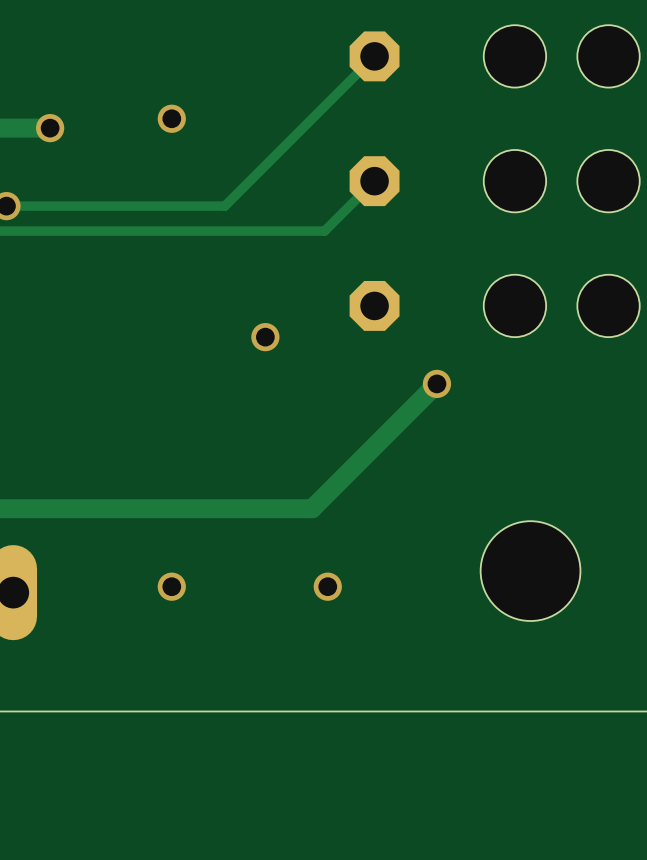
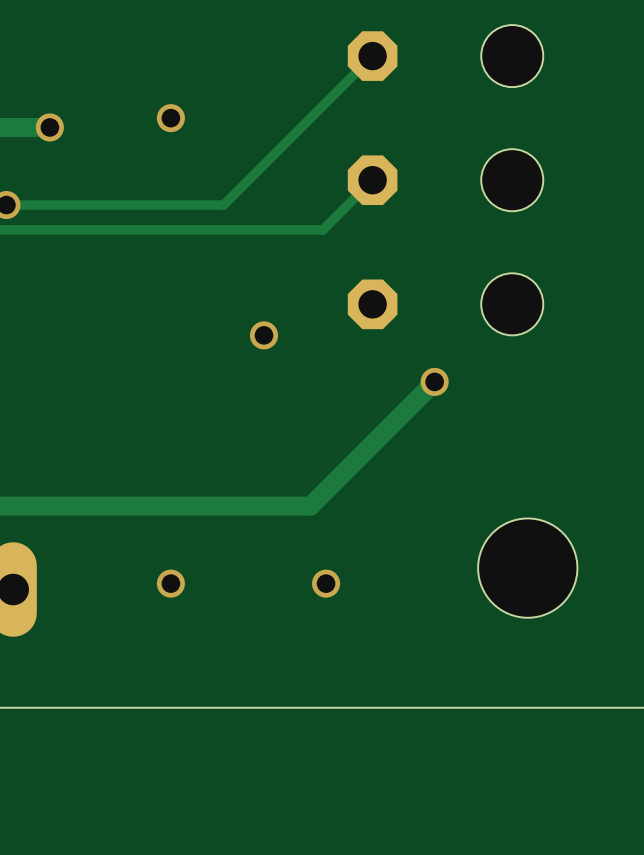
hole: (608, 56) -> none
hole: (608, 181) -> none
hole: (608, 305) -> none

